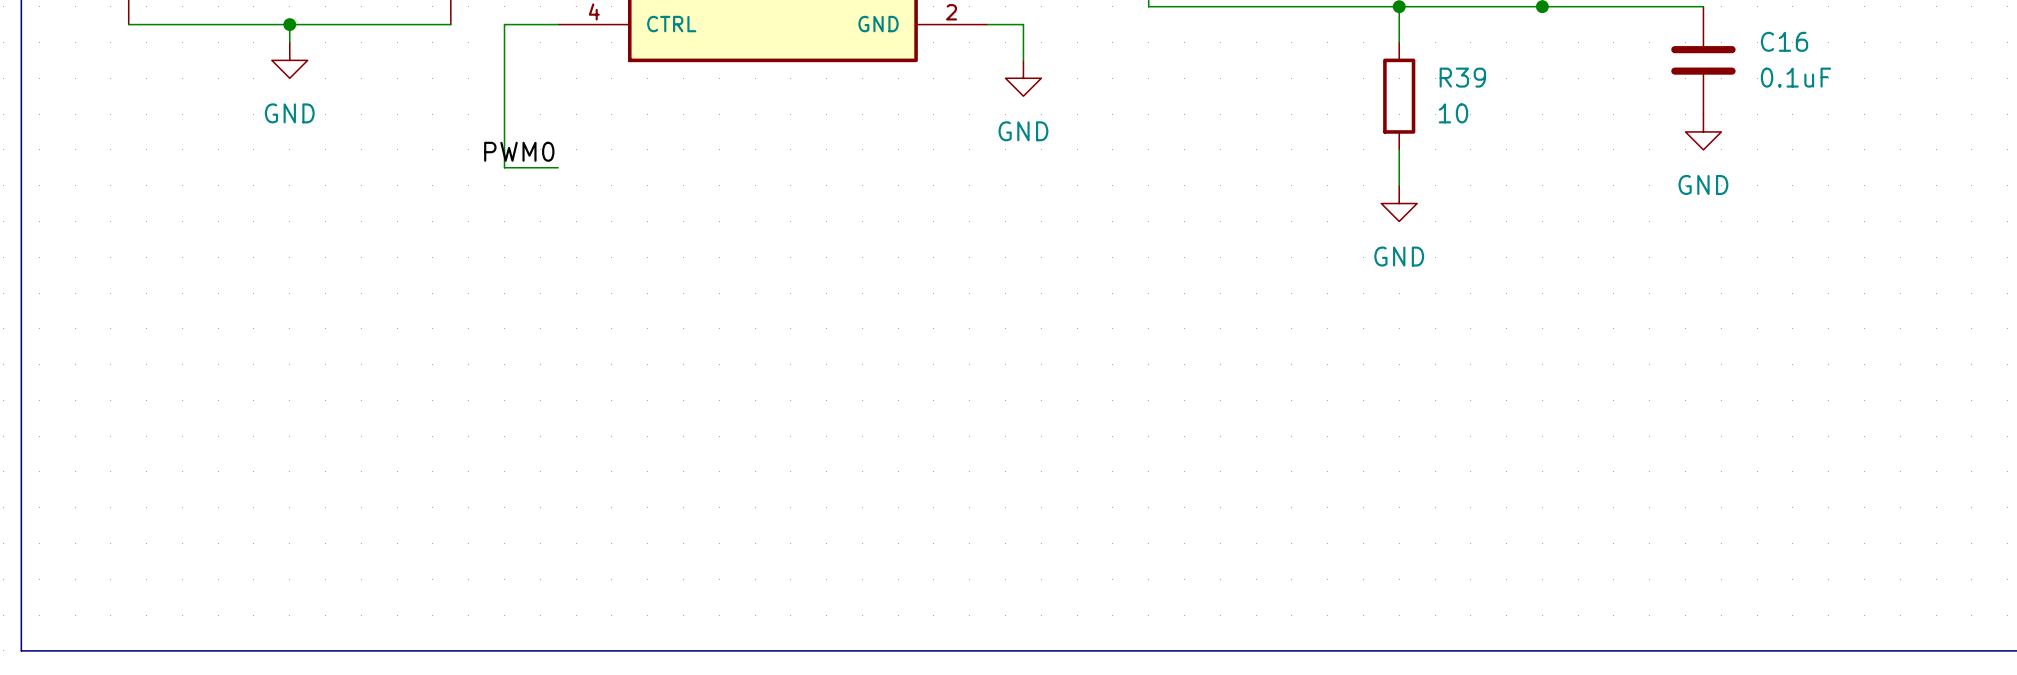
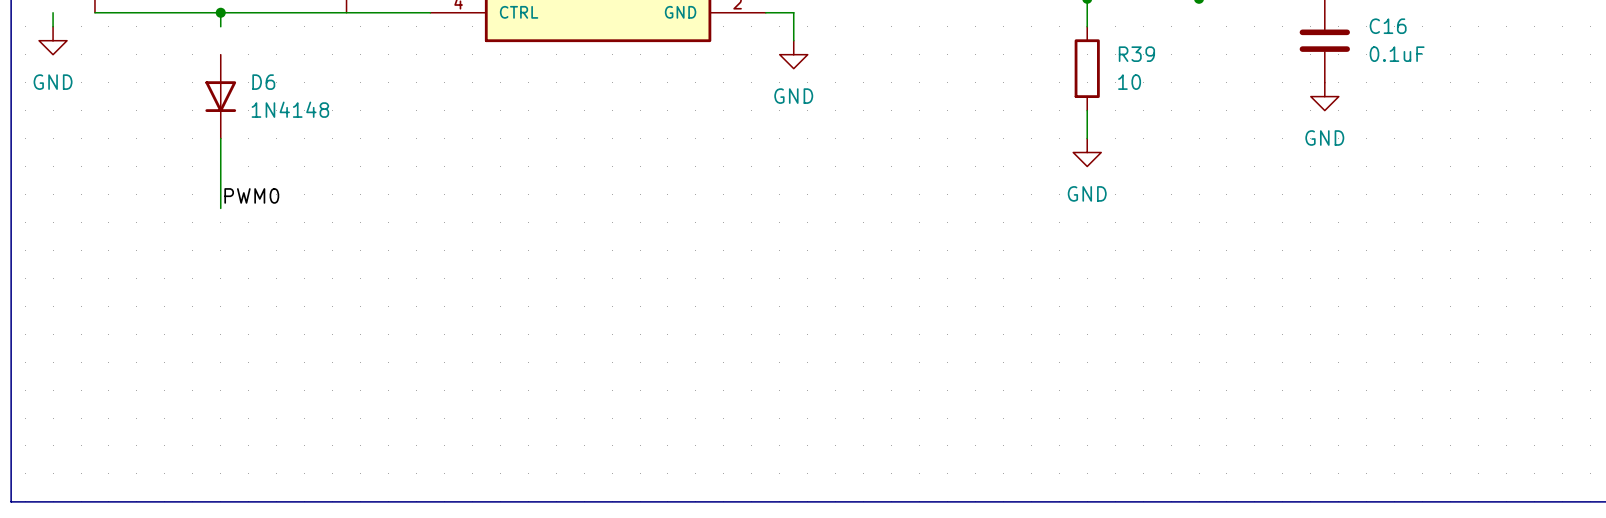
wire: none -> (53, 12) (53, 26)
wire: (504, 24) (504, 167) (558, 167) -> (388, 12) (346, 12)
power symbol: none -> GND (53, 40)
power symbol: GND (289, 60) -> none
D6: none -> 1N4148 (220, 96)
label position: PWM0 (519, 151) -> PWM0 (251, 195)
wire: none -> (220, 138) (220, 208)

